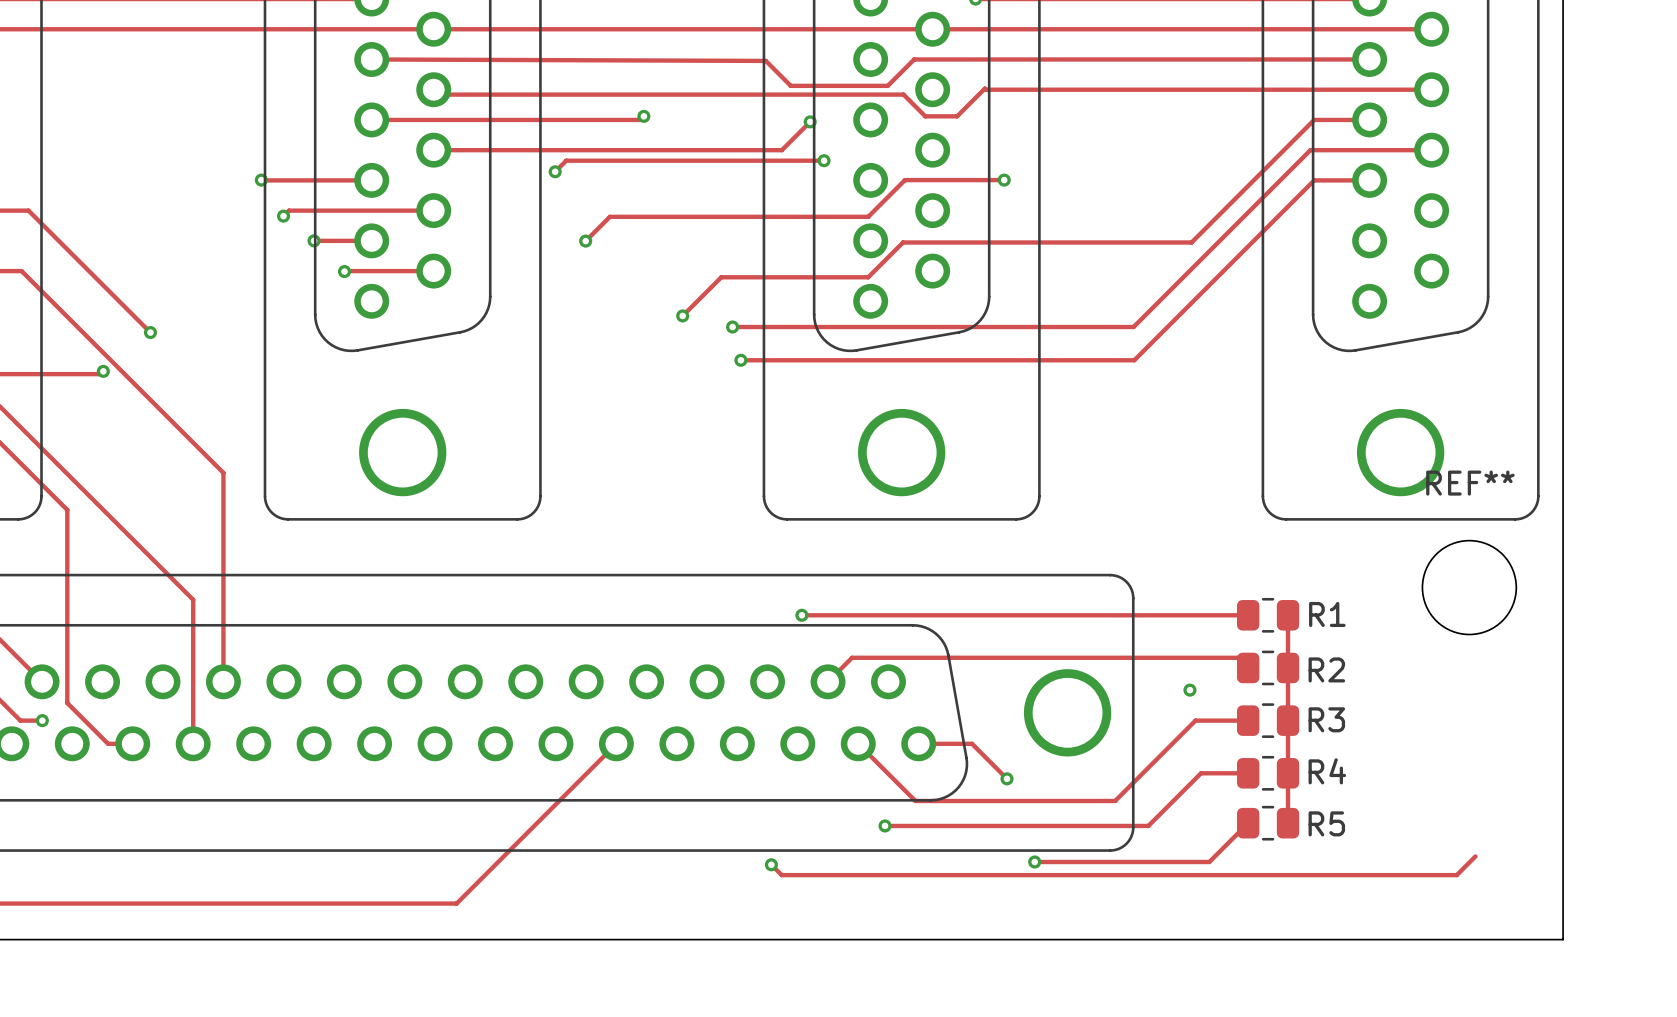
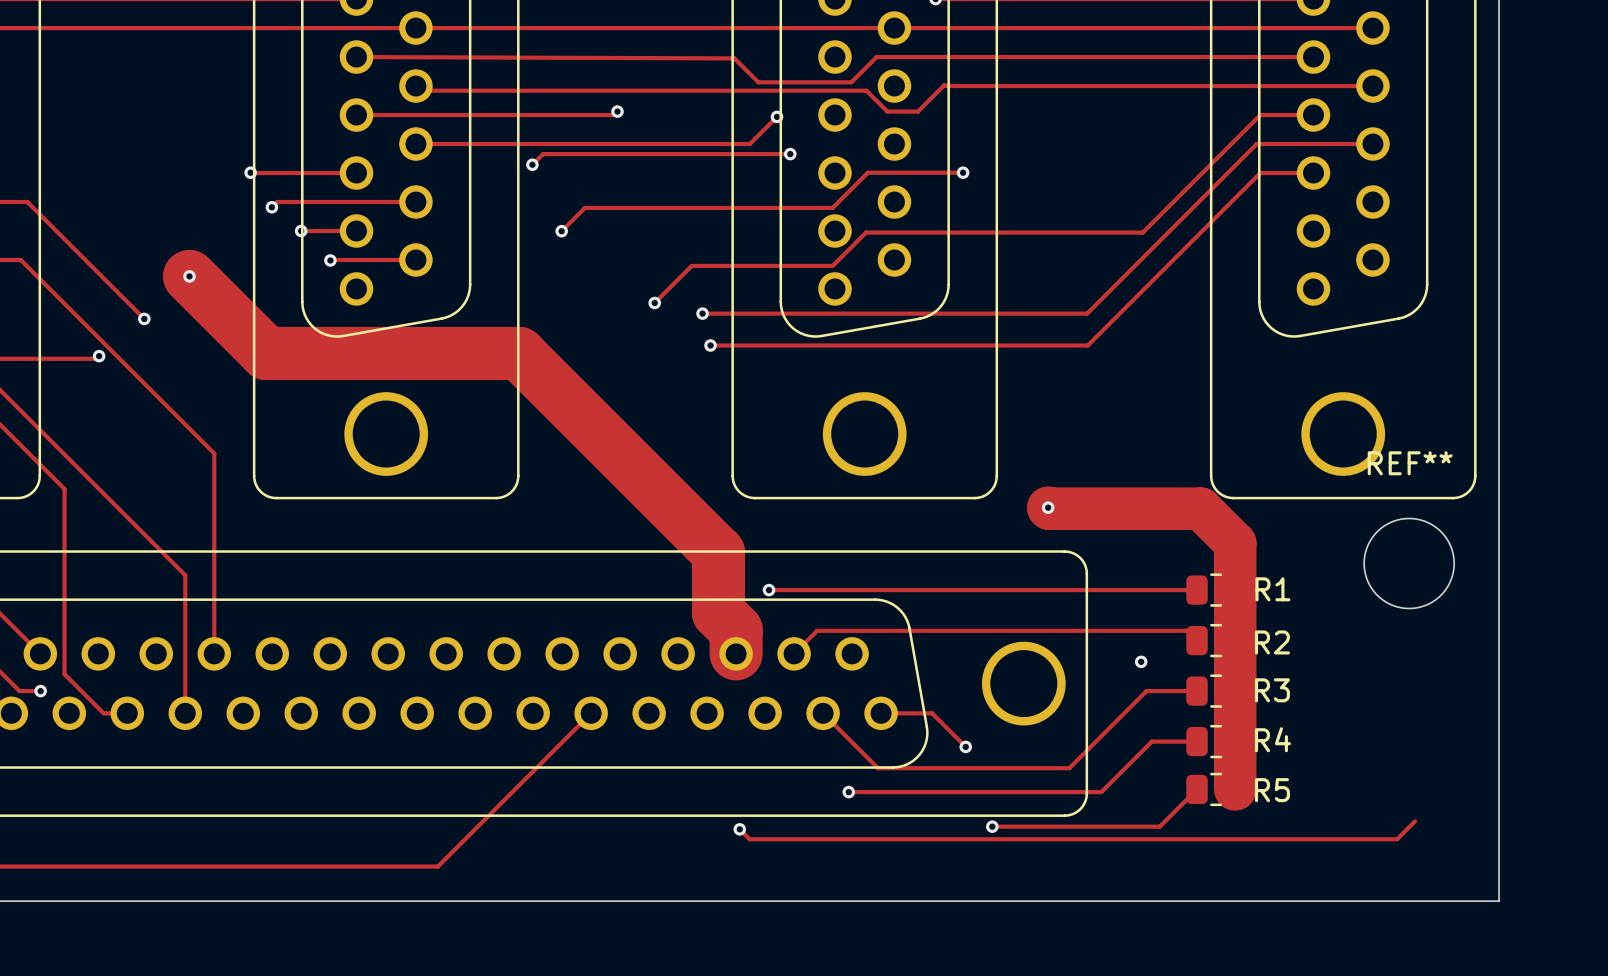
track: none -> (189, 276) (266, 353) (519, 353) (718, 552) (718, 612) (736, 630) (736, 653)
via: none -> (189, 276)
track: none -> (1048, 507) (1200, 508) (1235, 543) (1235, 789)
via: none -> (1048, 507)

